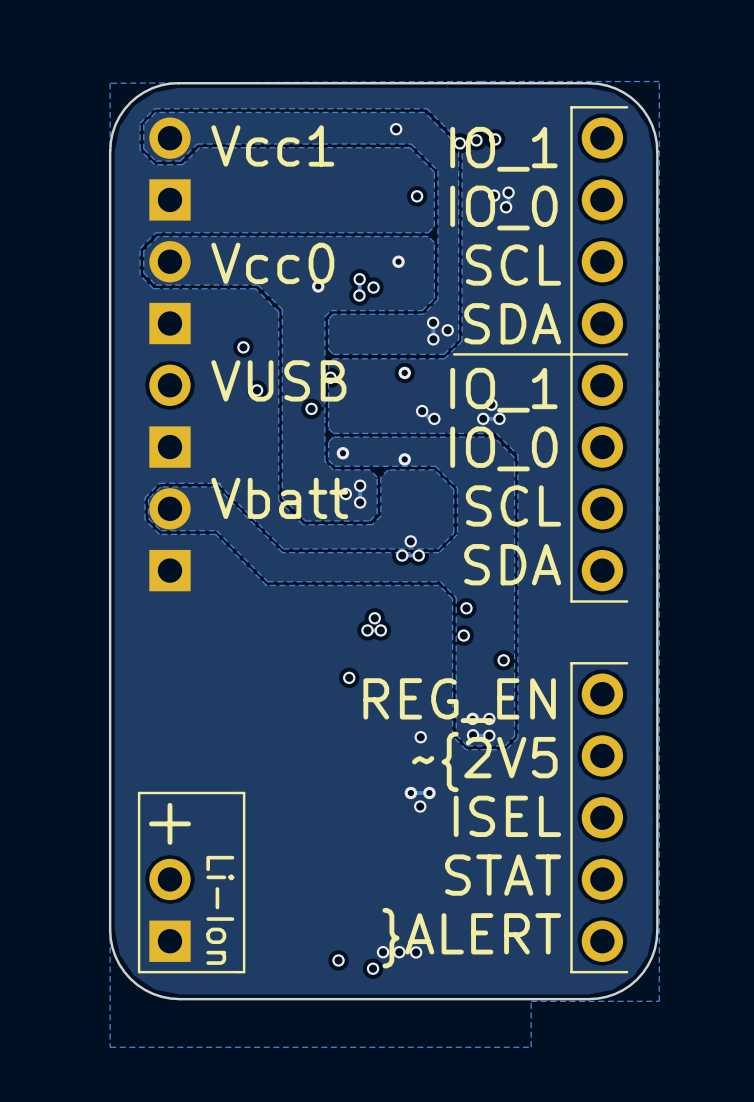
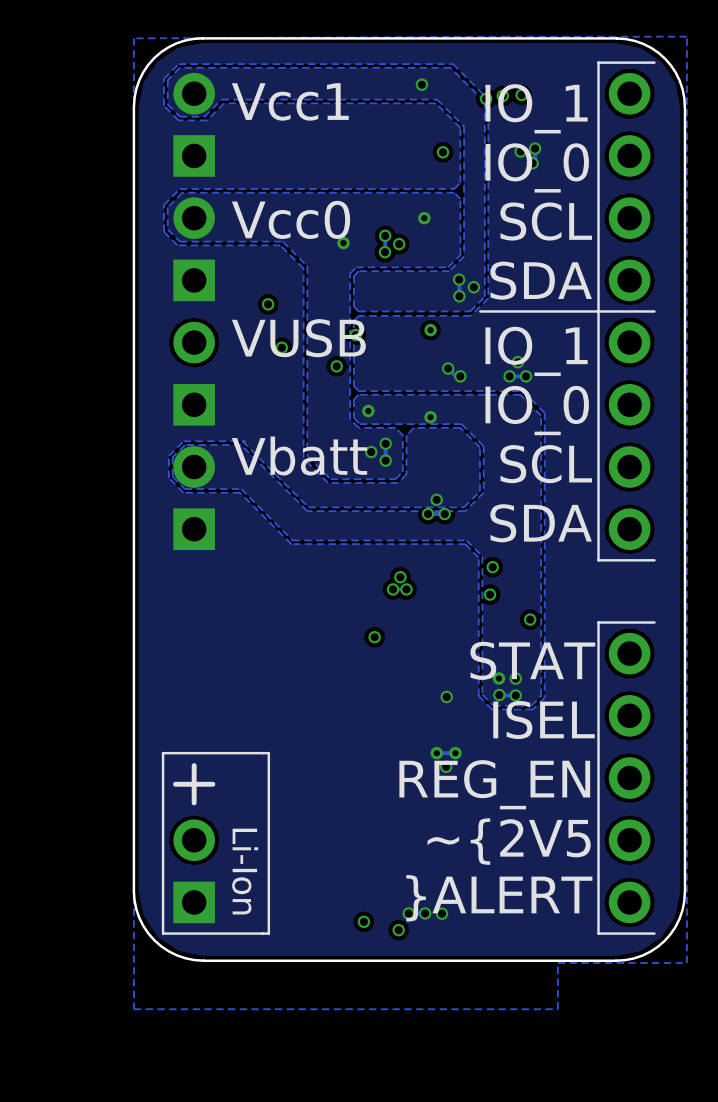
text: REG_EN (459, 700) -> STAT (532, 660)
text: ~{2V5 (484, 761) -> ISEL (544, 720)
text: ISEL (507, 816) -> REG_EN (494, 784)
text: STAT (503, 875) -> ~{2V5 (509, 841)

